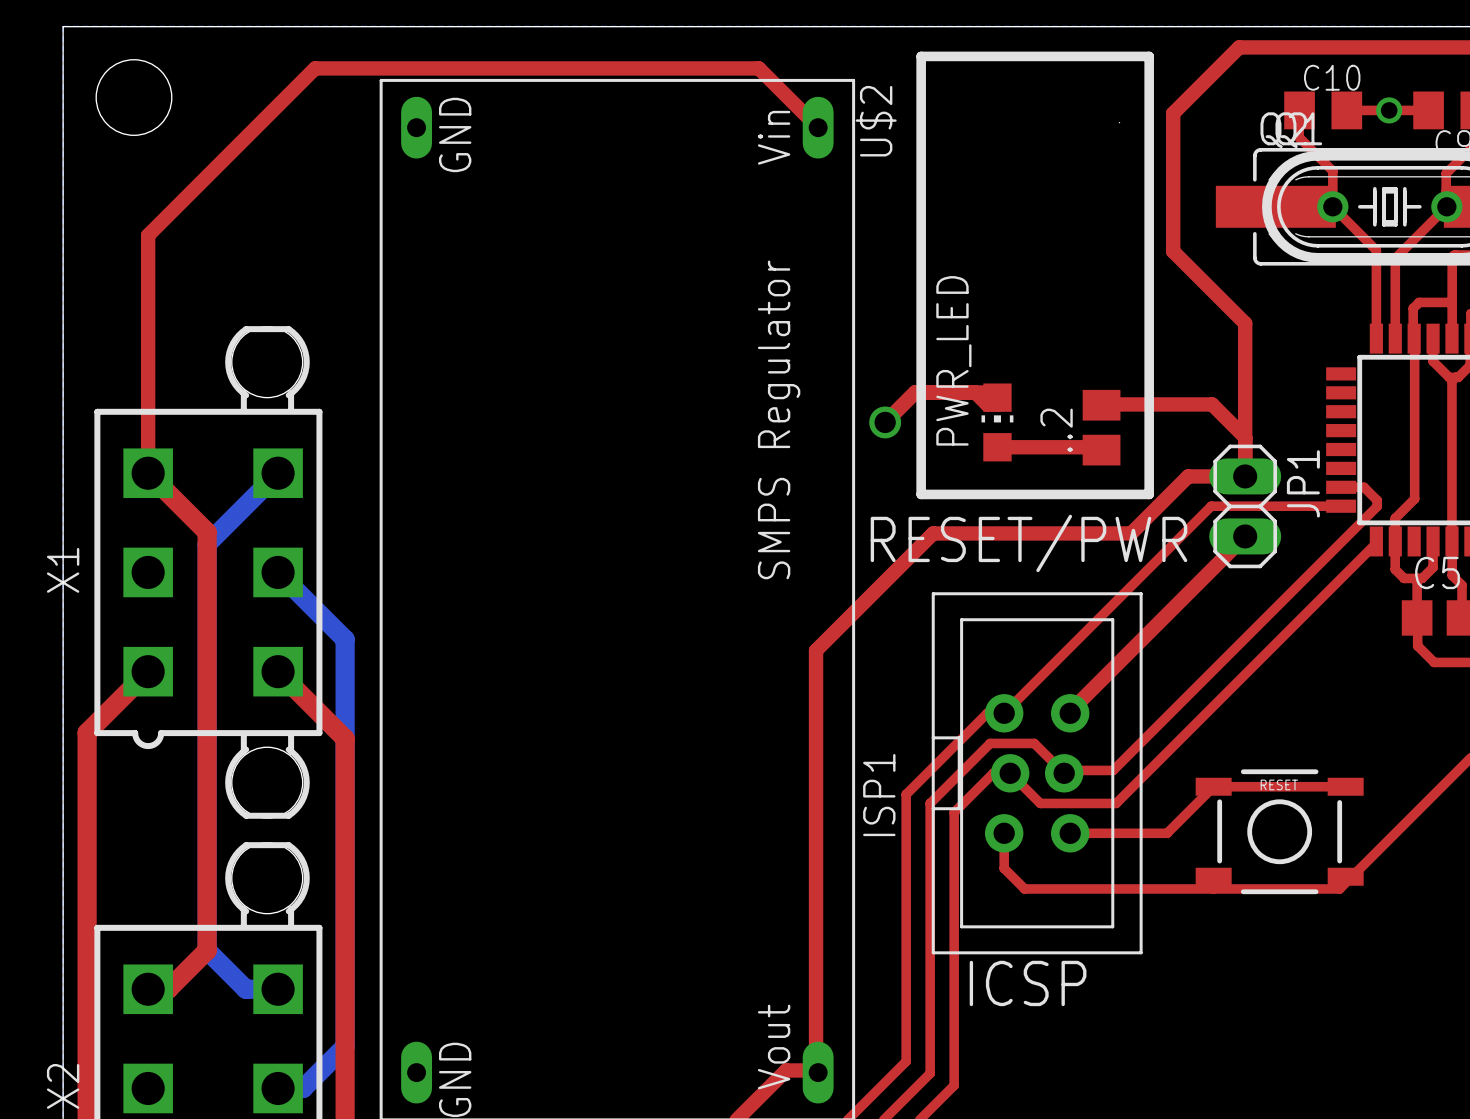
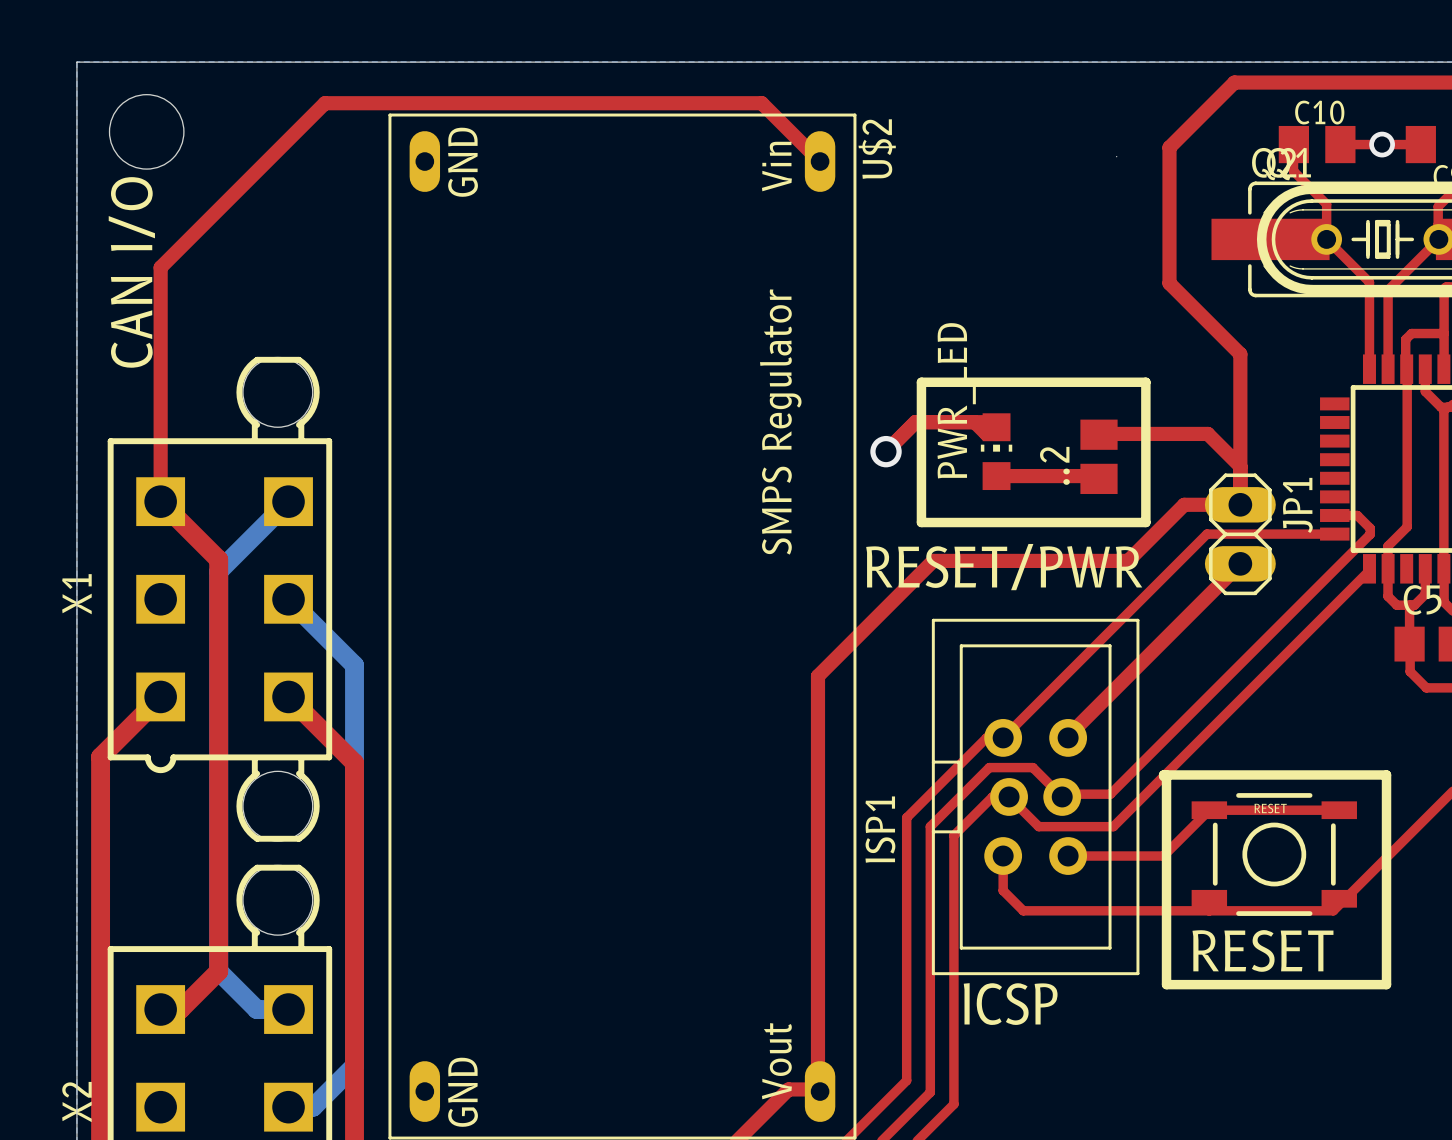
text: none -> CAN I/O (131, 272)
line: (921, 351) (921, 56) (1149, 56) (1149, 351) -> (921, 382) (1145, 382)
line: none -> (1166, 774) (1166, 984) (1386, 984) (1386, 774) (1163, 774) (1163, 776)
text: none -> RESET (1262, 950)

